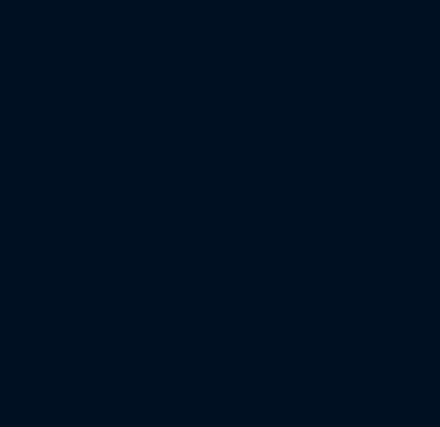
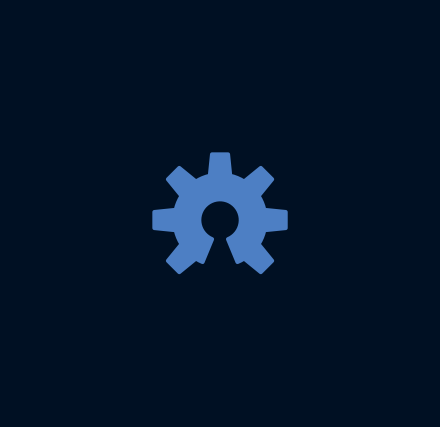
drawing: none -> [152, 152, 288, 275]

